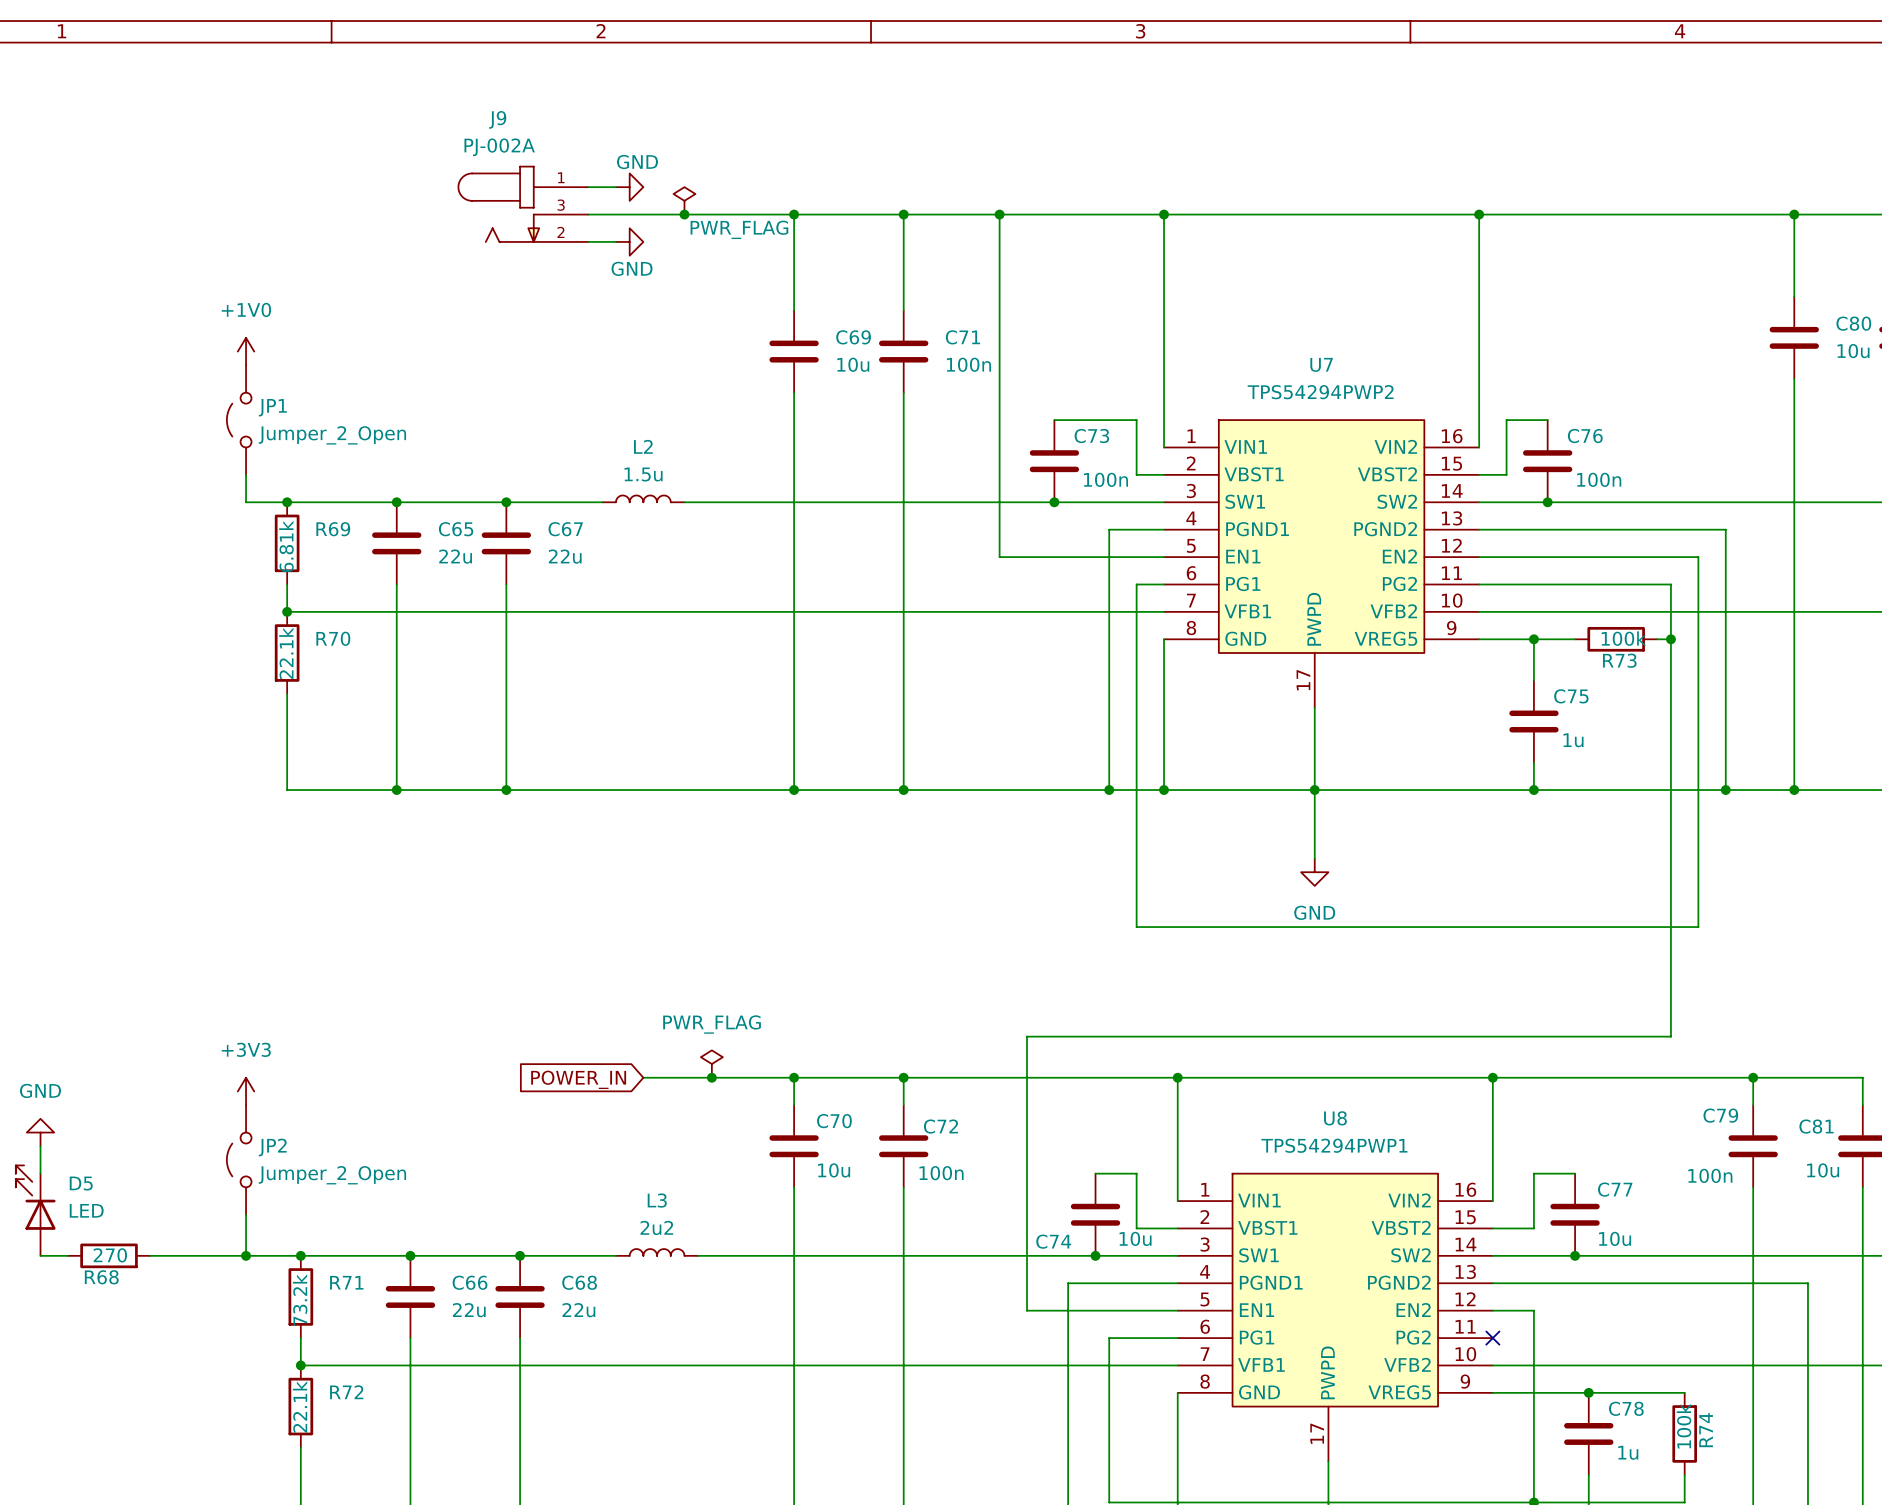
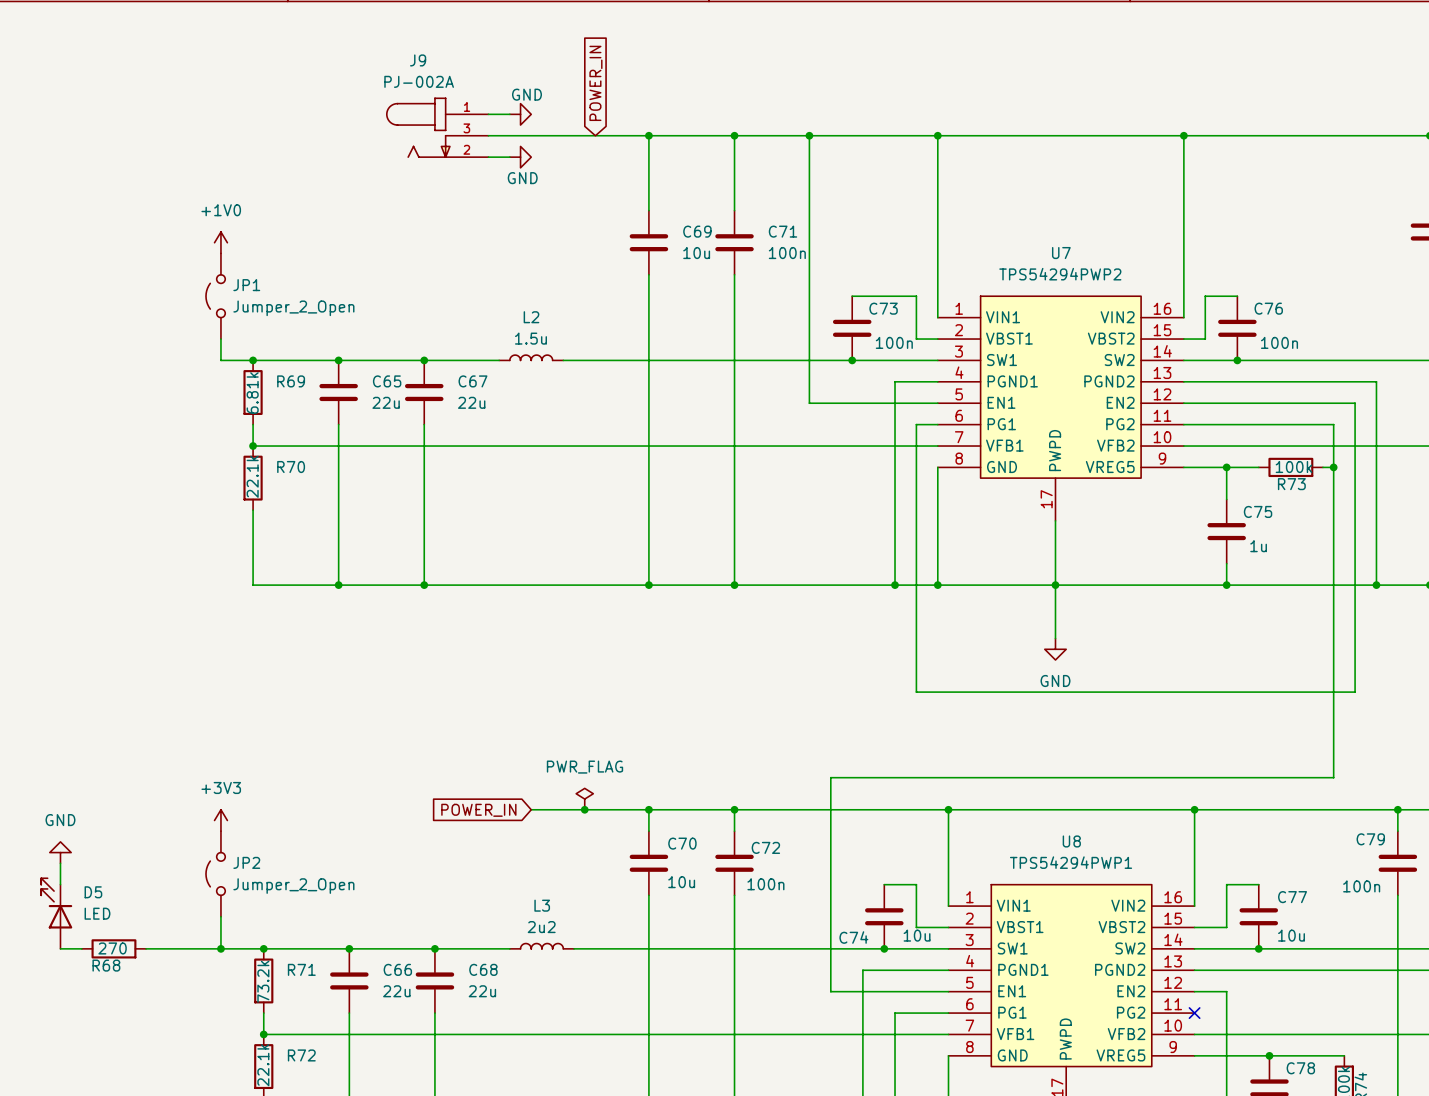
global label: none -> POWER_IN (595, 83)
power symbol: PWR_FLAG (684, 200) -> none
junction: (684, 214) -> none

